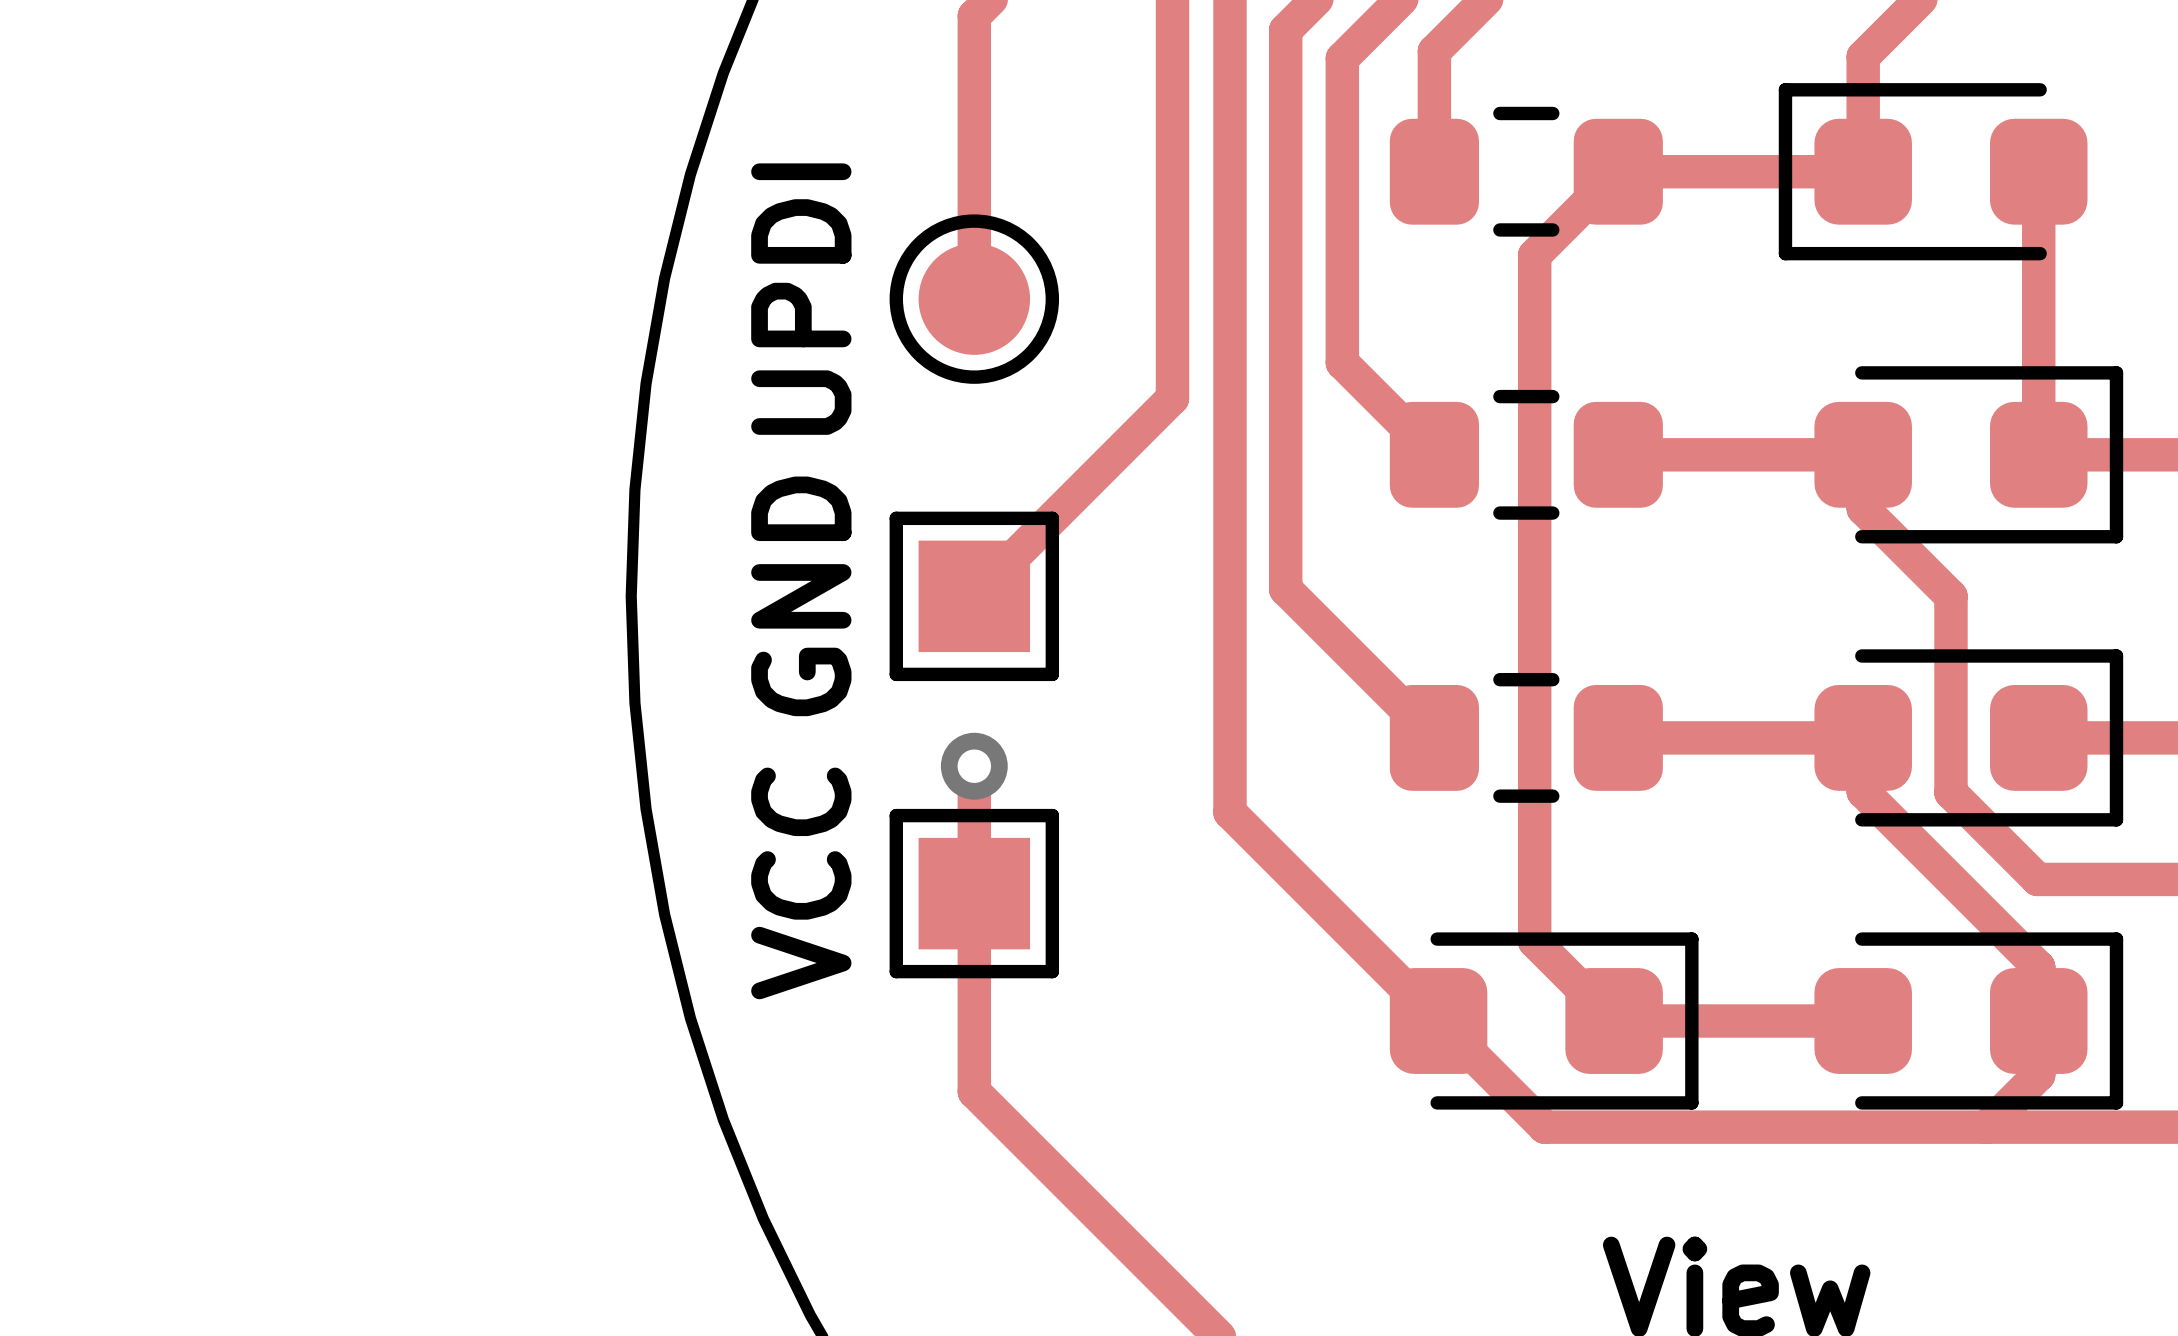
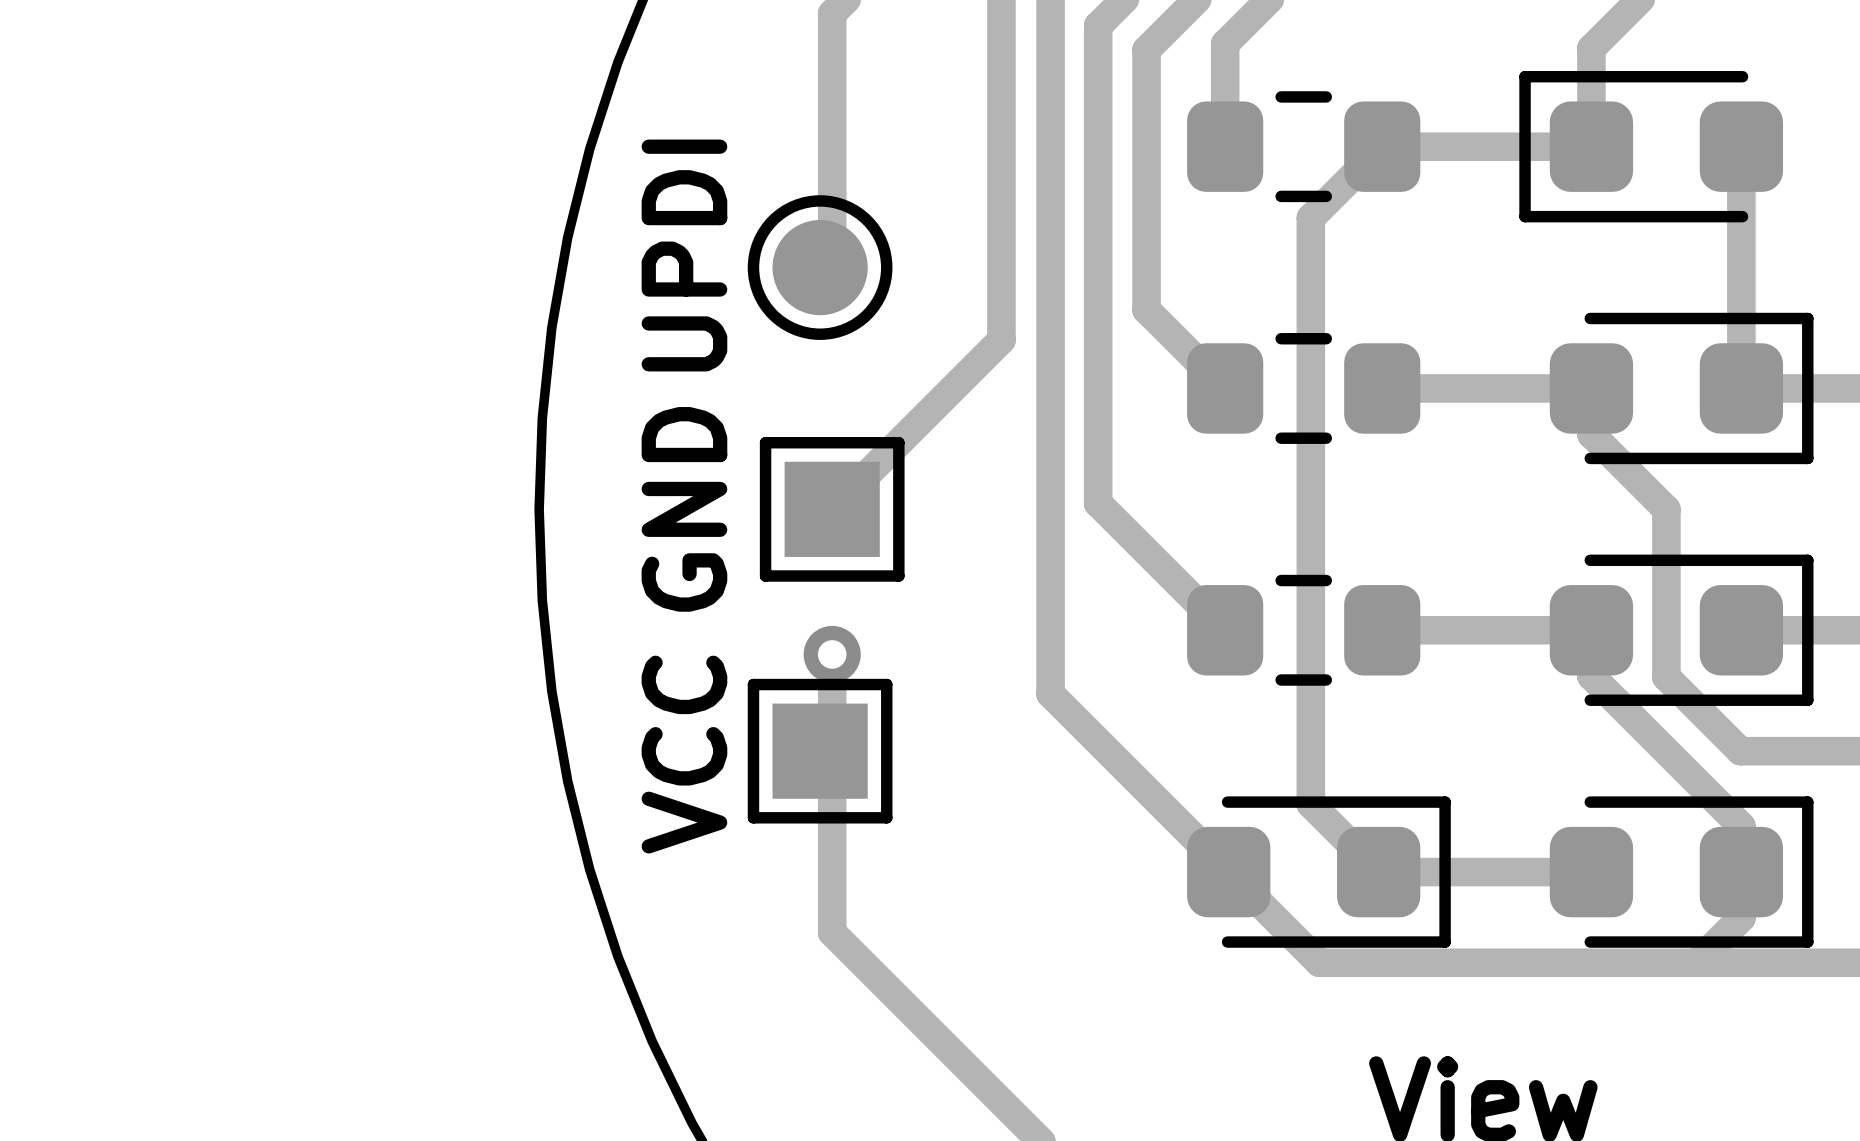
part position: (974, 299) -> (820, 267)
part position: (974, 893) -> (820, 751)

